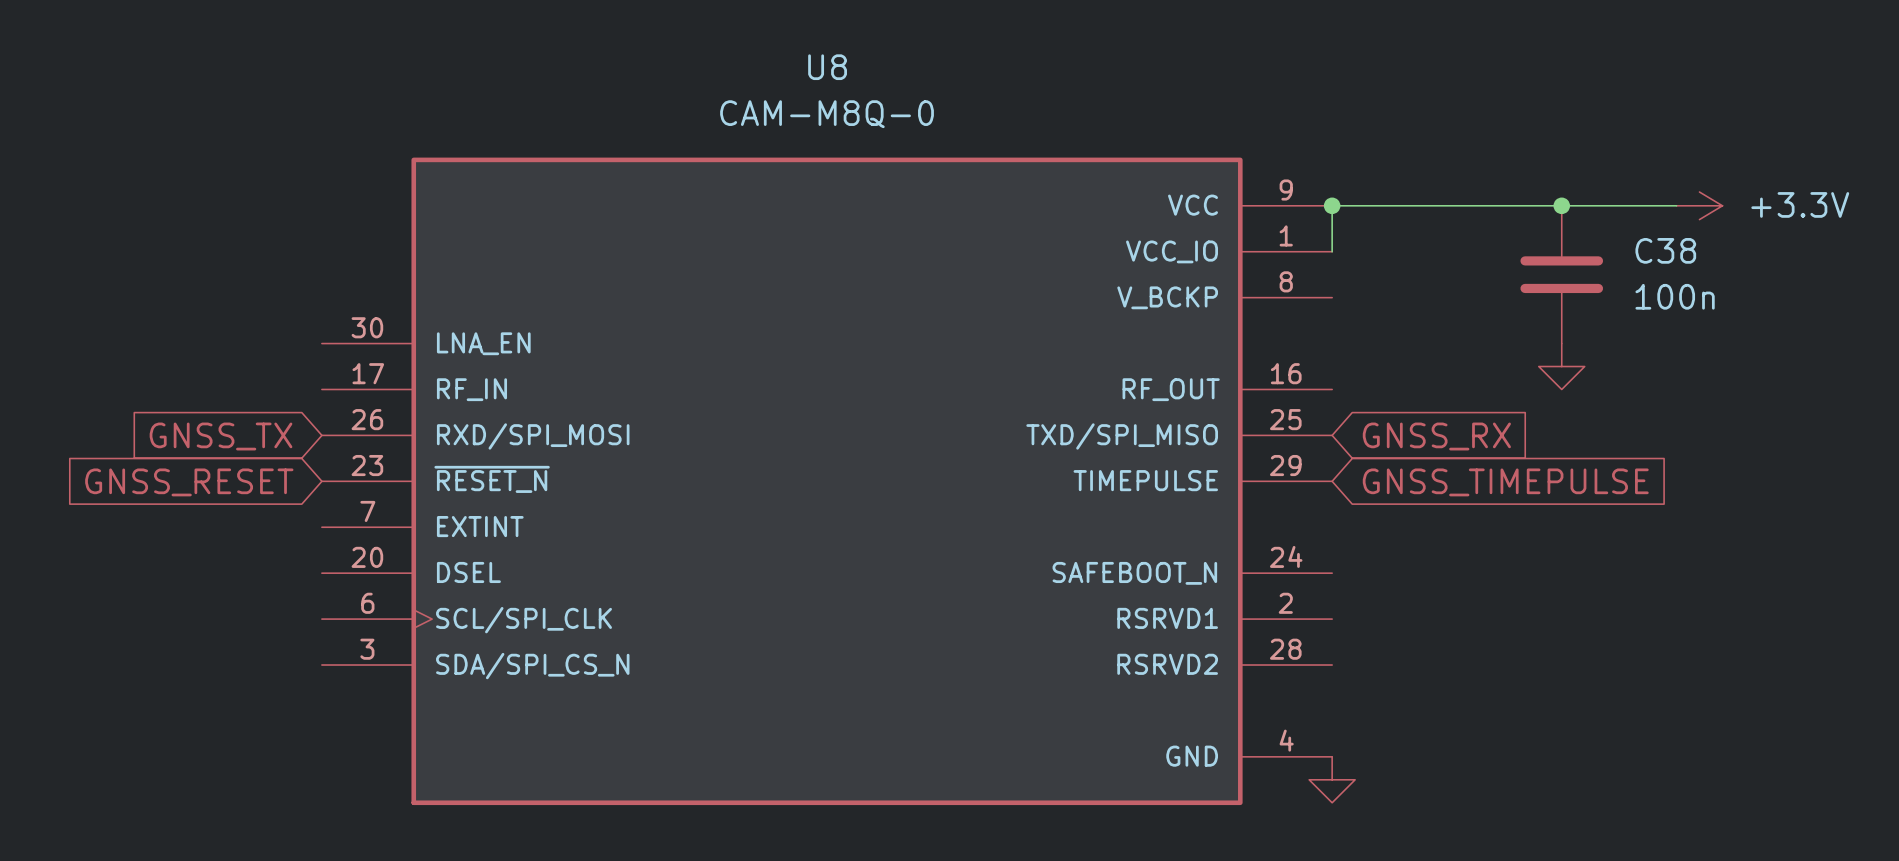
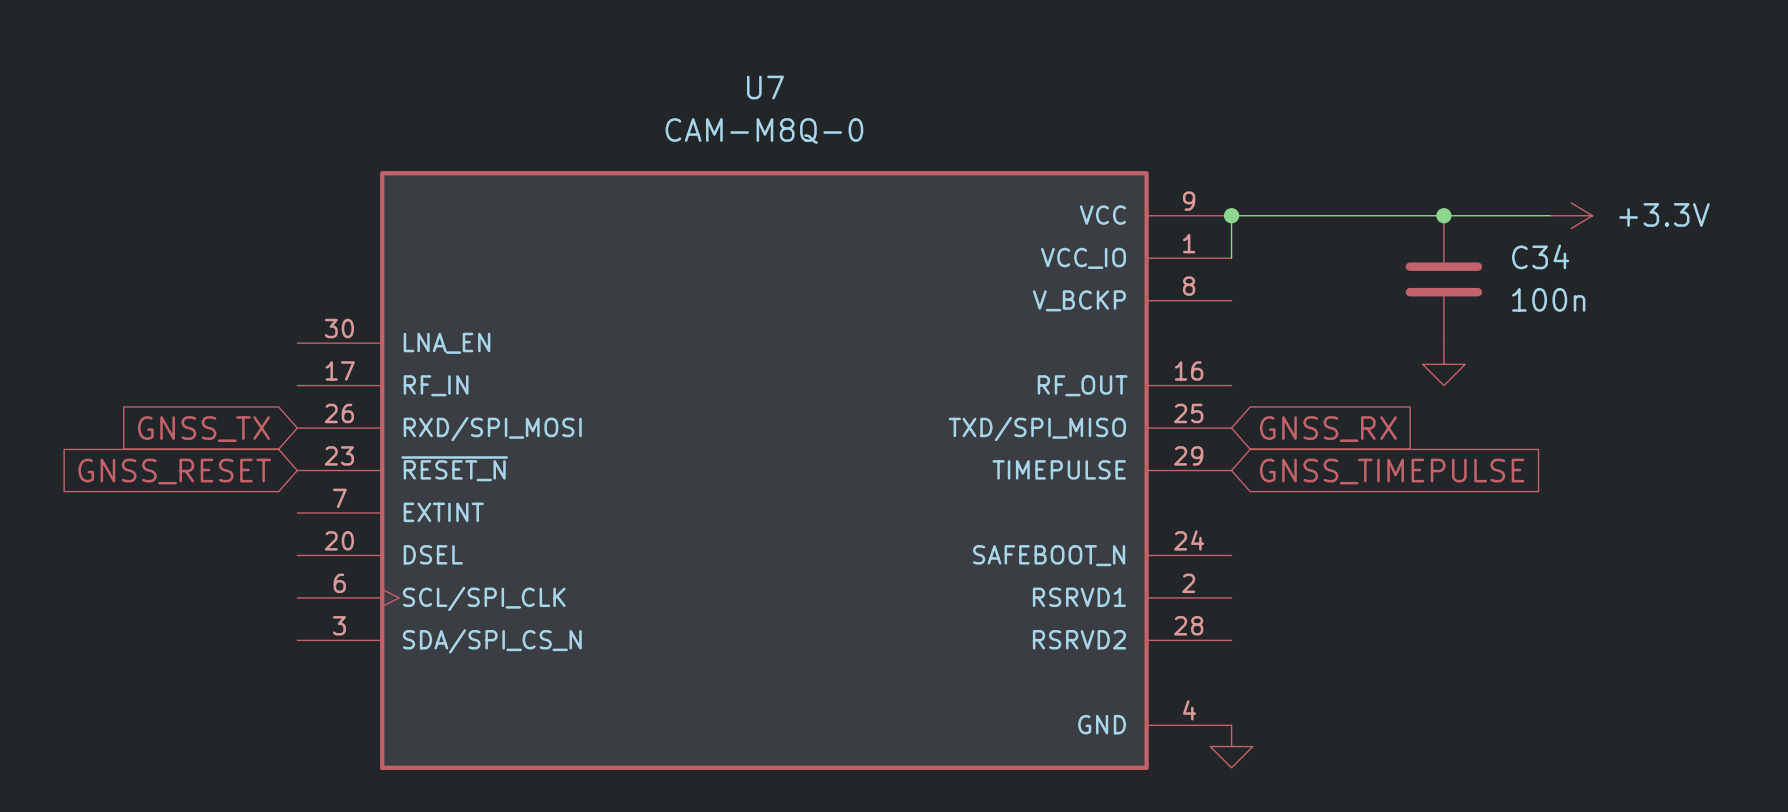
U8 name: U8 (827, 67) -> U7 (765, 87)
C38 name: C38 (1665, 250) -> C34 (1540, 256)

